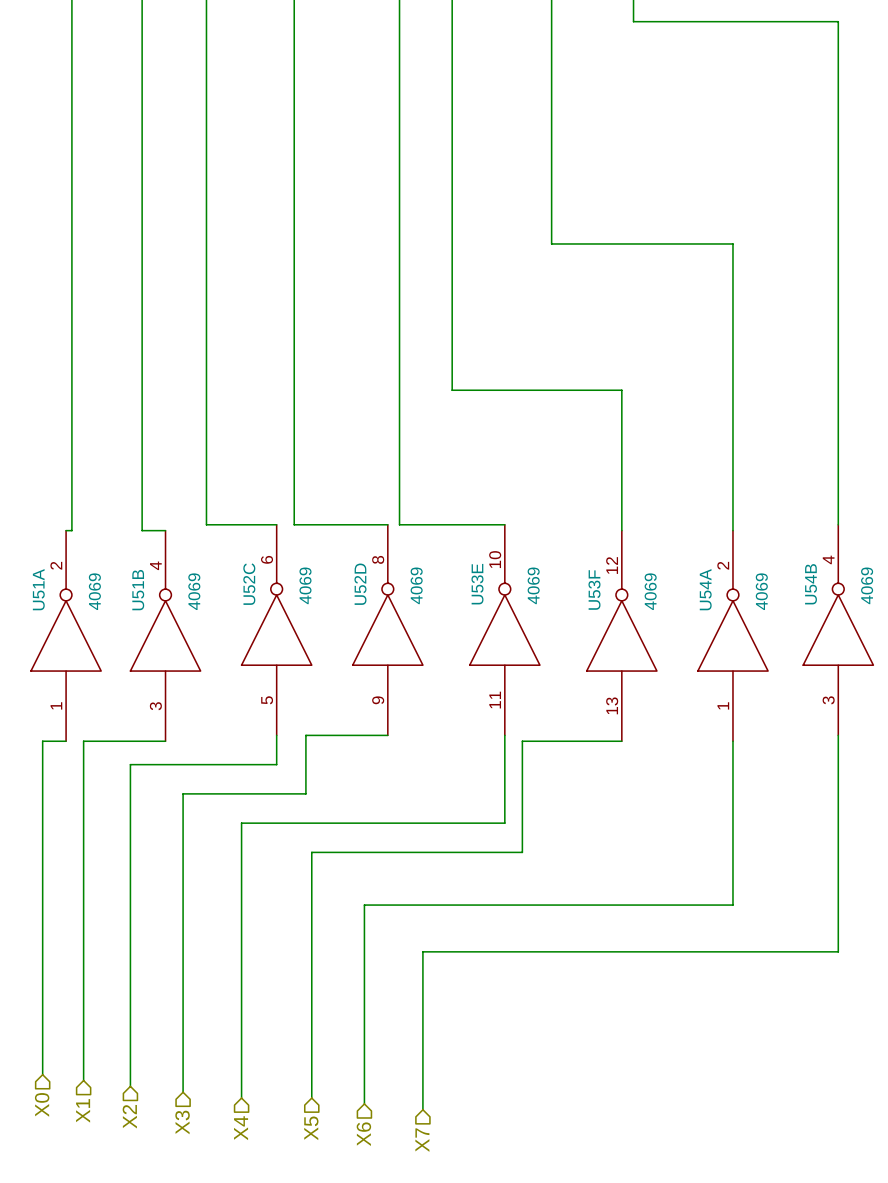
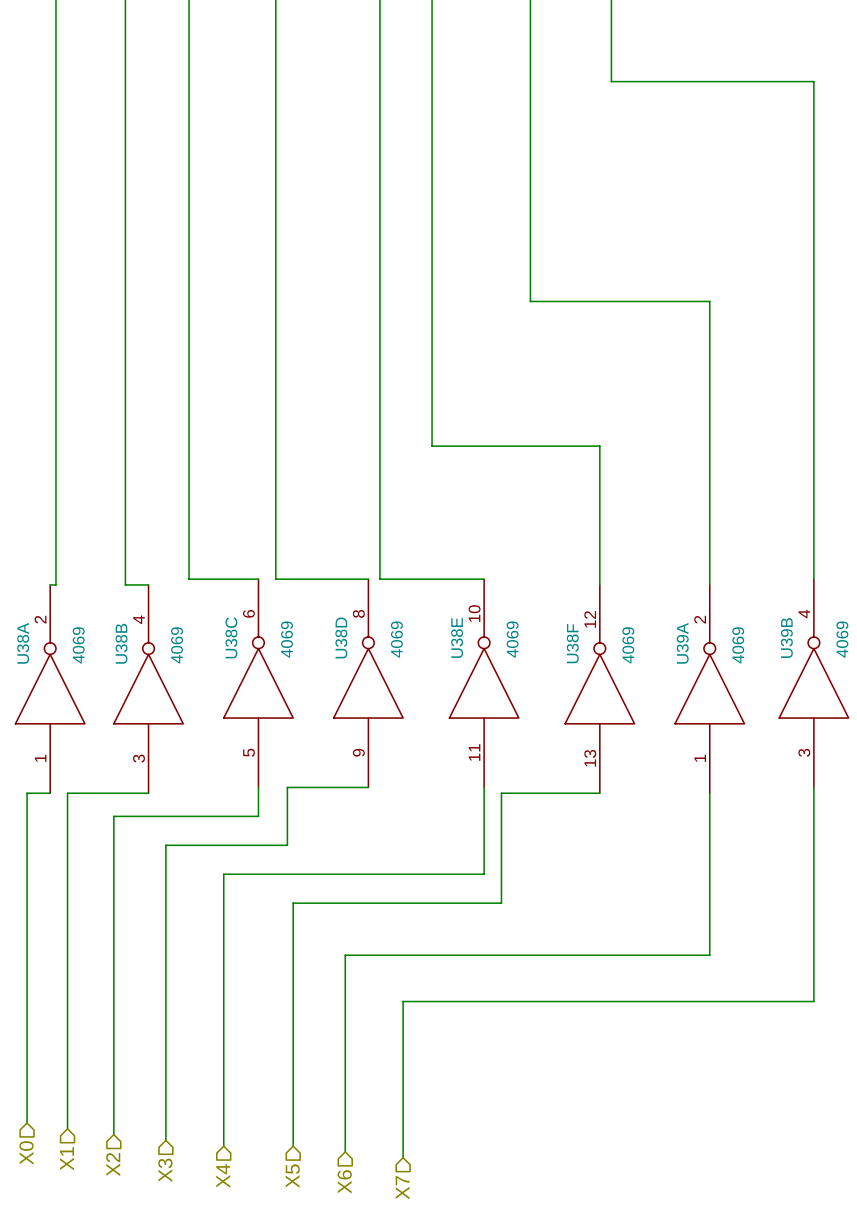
U52C name: U52C (249, 584) -> U38C (231, 637)
U52D name: U52D (360, 584) -> U38D (341, 637)
U53E name: U53E (477, 584) -> U38E (457, 637)
U54B name: U54B (811, 584) -> U39B (786, 637)
U51A name: U51A (38, 589) -> U38A (23, 643)
U54A name: U54A (705, 589) -> U39A (682, 643)
U51B name: U51B (138, 590) -> U38B (121, 643)
U53F name: U53F (594, 590) -> U38F (572, 643)

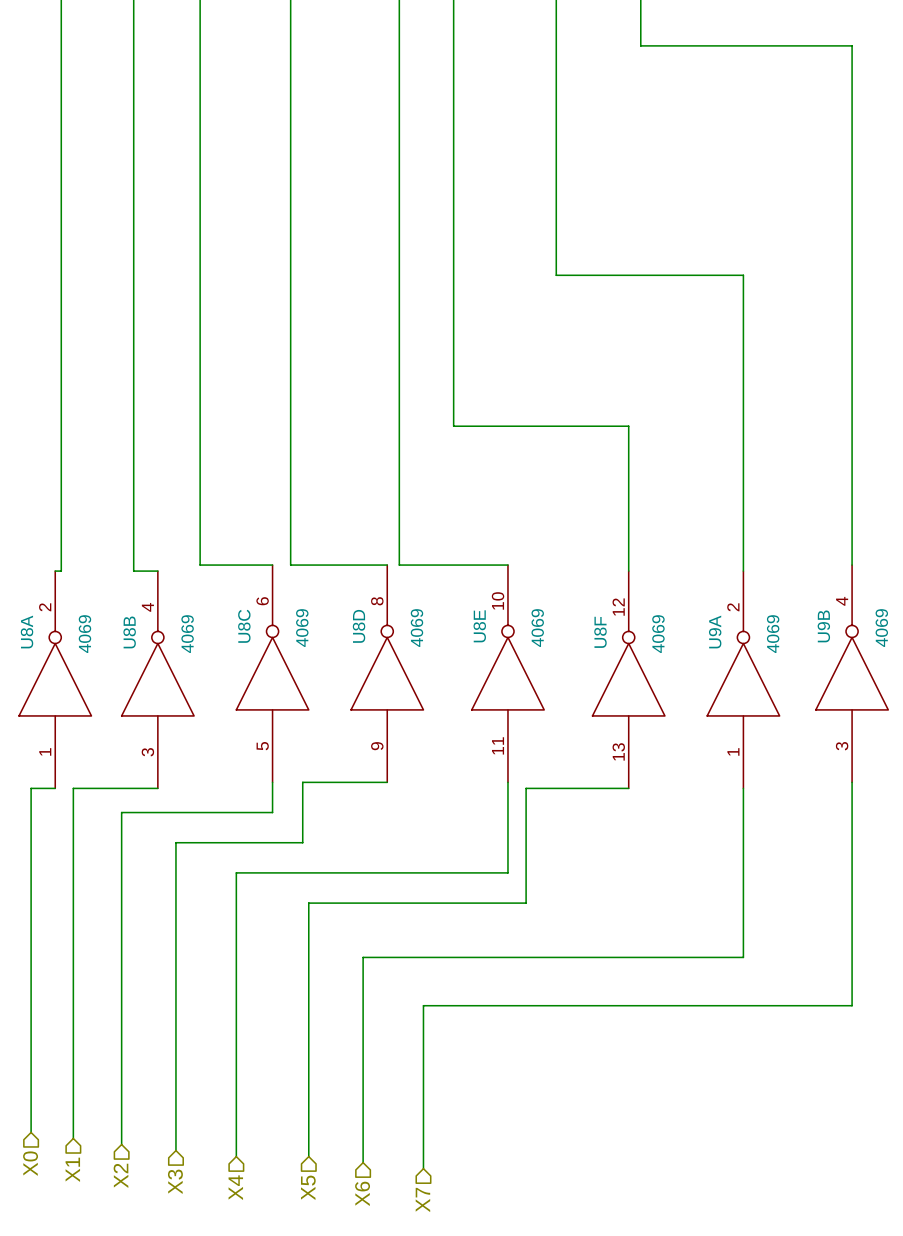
U38C name: U38C (231, 637) -> U8C (244, 626)
U38D name: U38D (341, 637) -> U8D (359, 626)
U38E name: U38E (457, 637) -> U8E (479, 626)
U39B name: U39B (786, 637) -> U9B (823, 626)
U38A name: U38A (23, 643) -> U8A (27, 632)
U38B name: U38B (121, 643) -> U8B (129, 632)
U38F name: U38F (572, 643) -> U8F (600, 632)
U39A name: U39A (682, 643) -> U9A (715, 632)

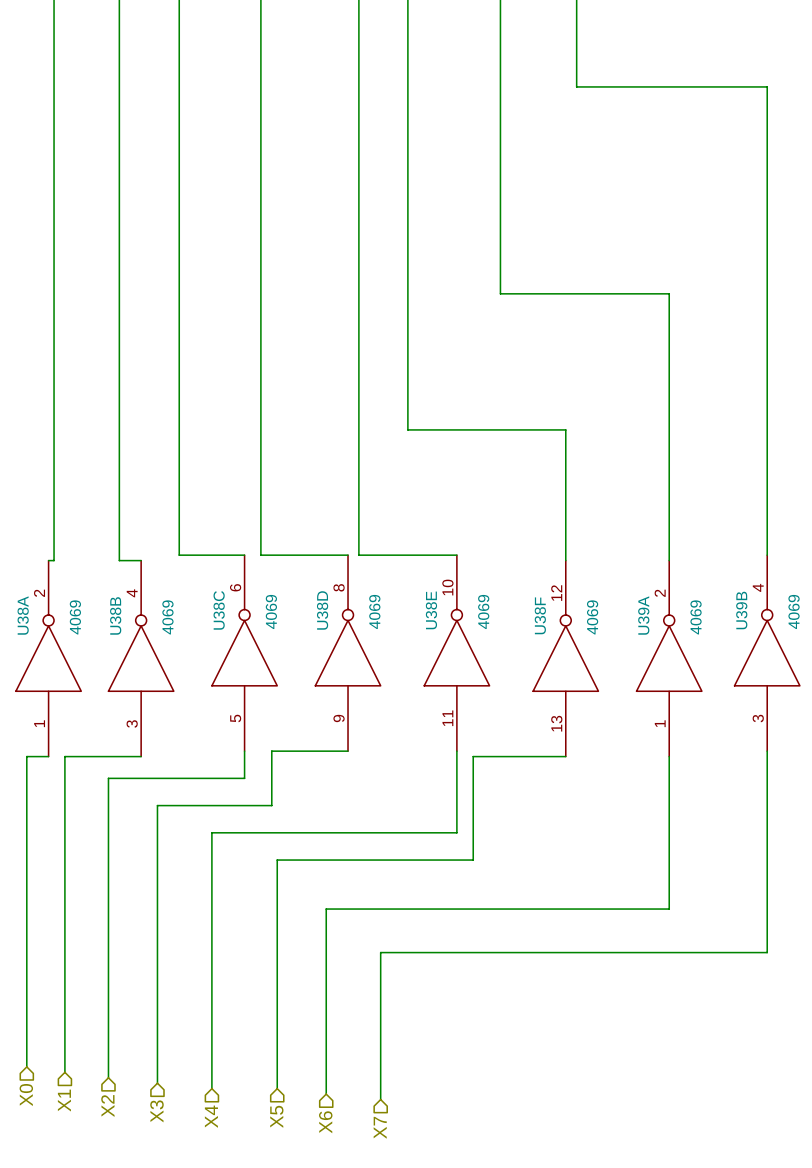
U8C name: U8C (244, 626) -> U38C (219, 610)
U8D name: U8D (359, 626) -> U38D (322, 610)
U8E name: U8E (479, 626) -> U38E (431, 610)
U9B name: U9B (823, 626) -> U39B (741, 610)
U8A name: U8A (27, 632) -> U38A (23, 615)
U8B name: U8B (129, 632) -> U38B (115, 615)
U8F name: U8F (600, 632) -> U38F (540, 615)
U9A name: U9A (715, 632) -> U39A (643, 615)

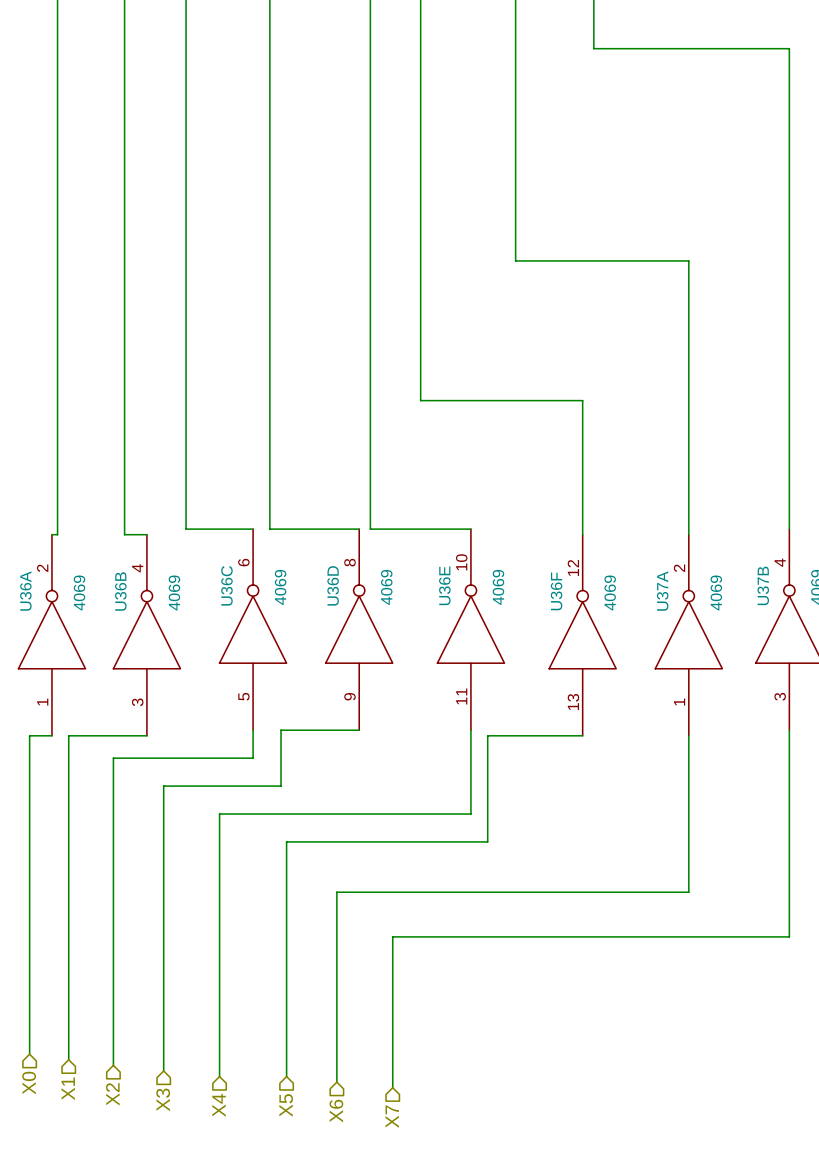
U38C name: U38C (219, 610) -> U36C (226, 585)
U38D name: U38D (322, 610) -> U36D (333, 585)
U38E name: U38E (431, 610) -> U36E (444, 585)
U39B name: U39B (741, 610) -> U37B (763, 585)
U38A name: U38A (23, 615) -> U36A (25, 591)
U38B name: U38B (115, 615) -> U36B (120, 591)
U38F name: U38F (540, 615) -> U36F (556, 591)
U39A name: U39A (643, 615) -> U37A (662, 591)

